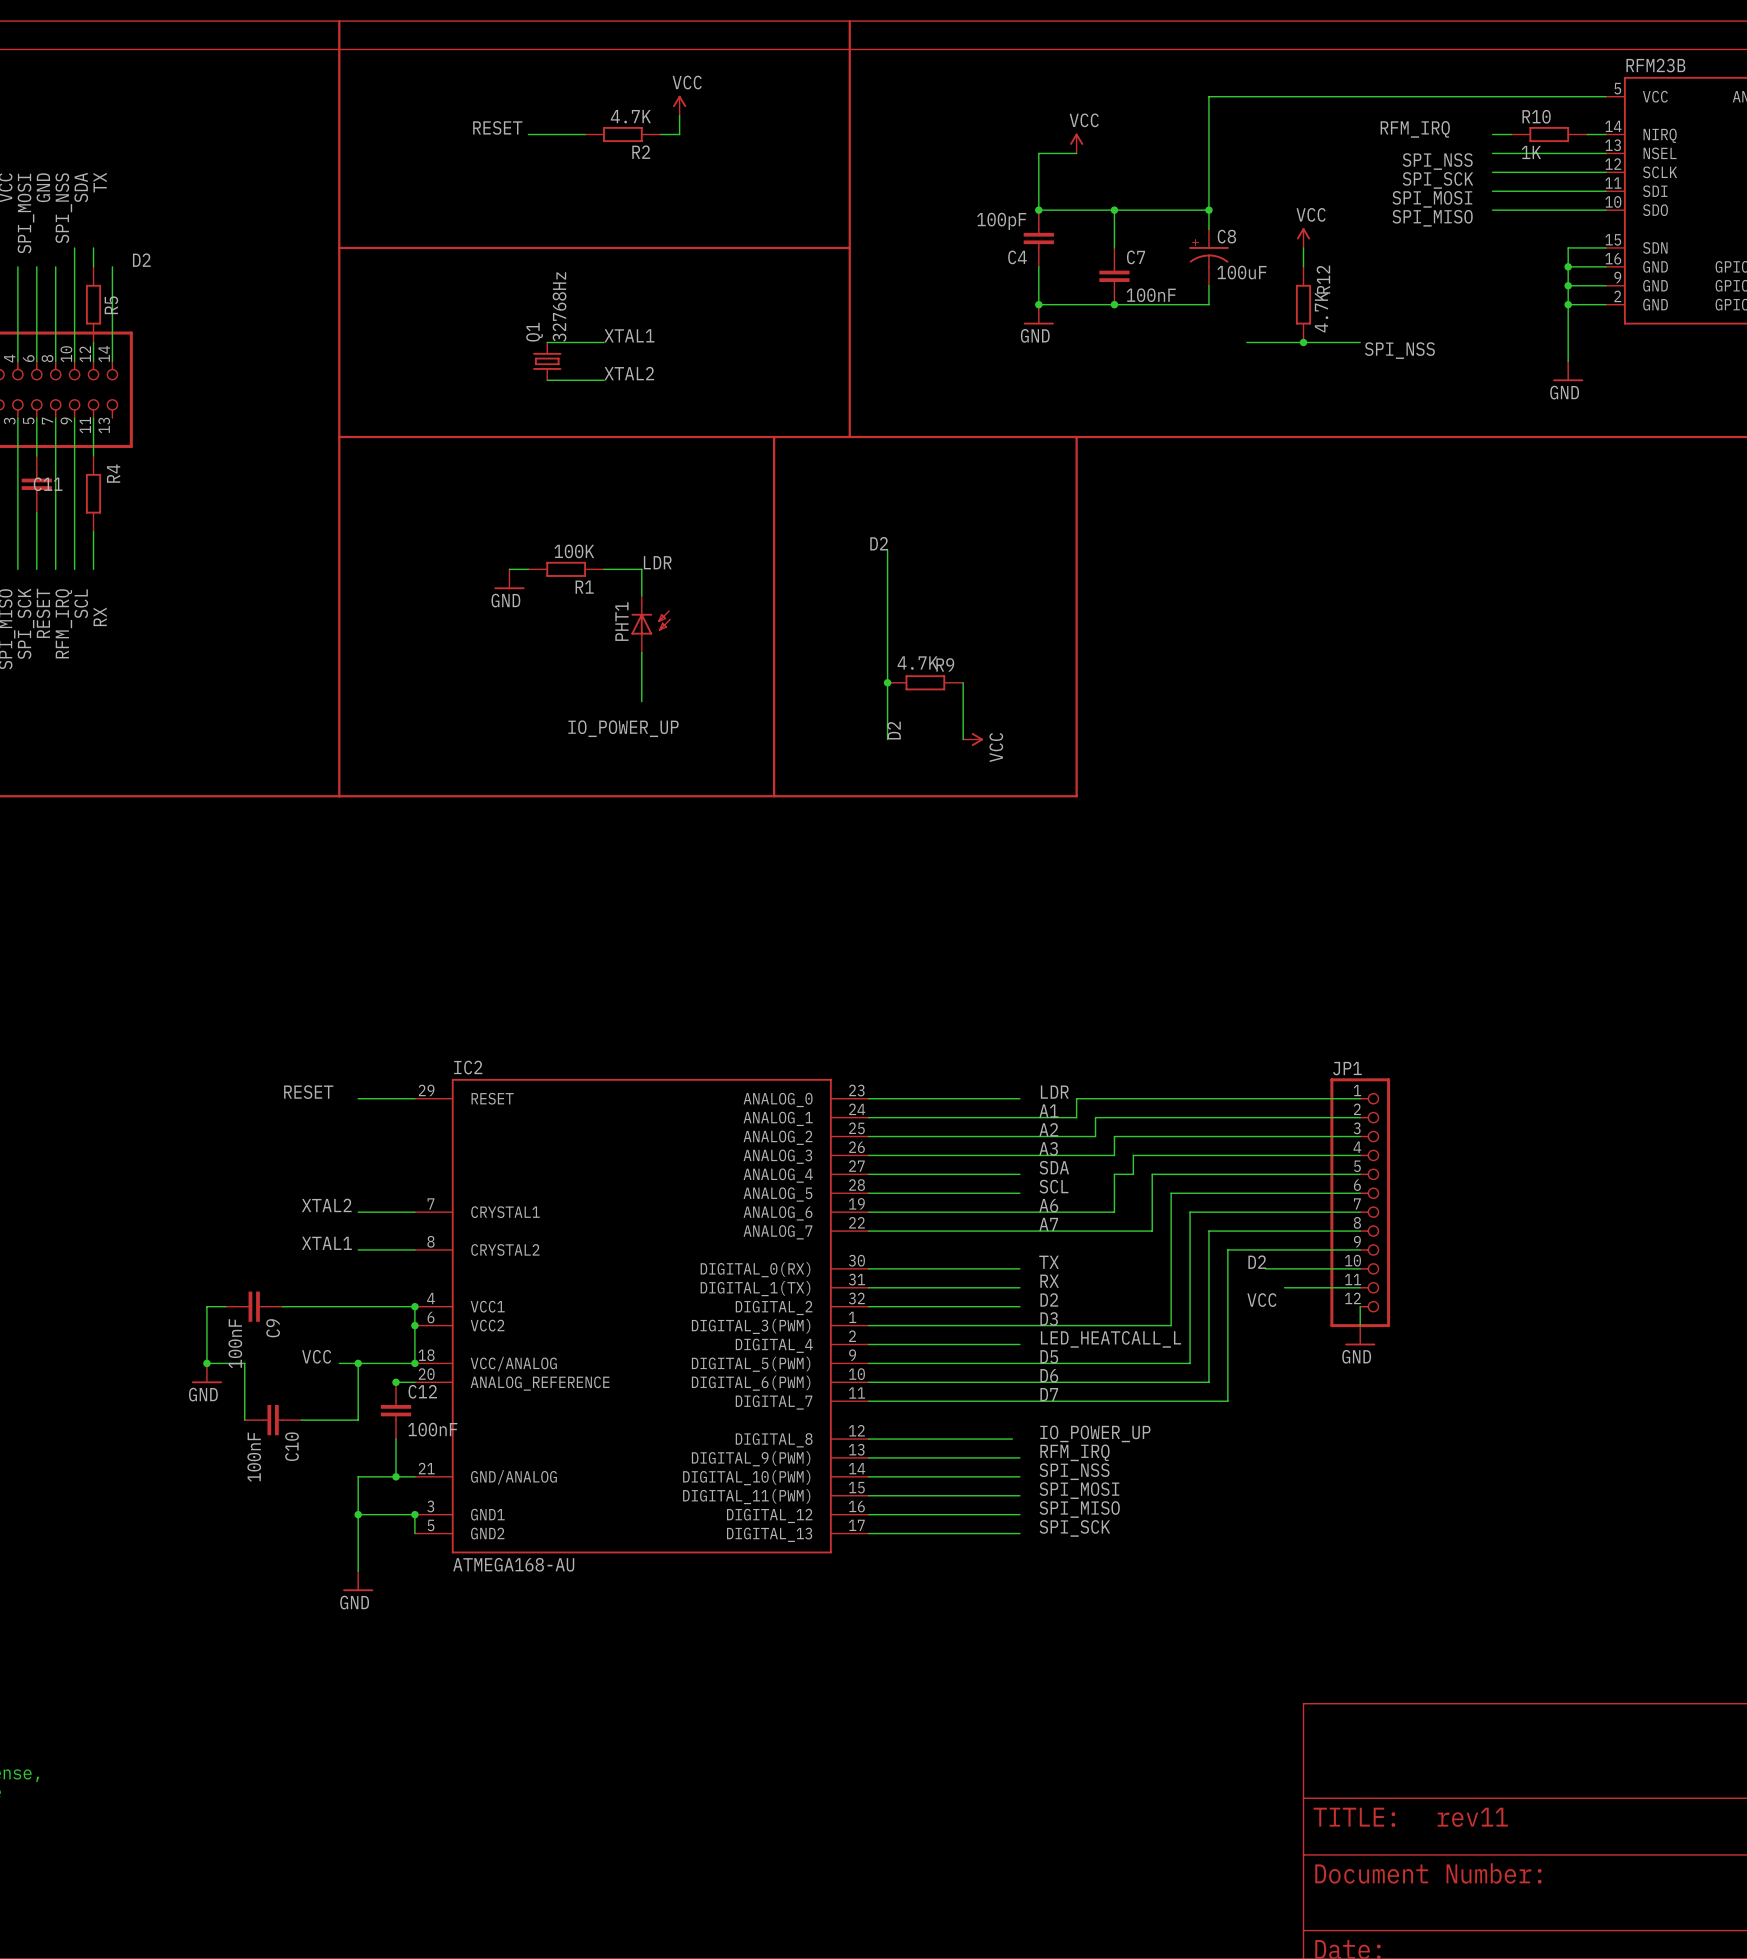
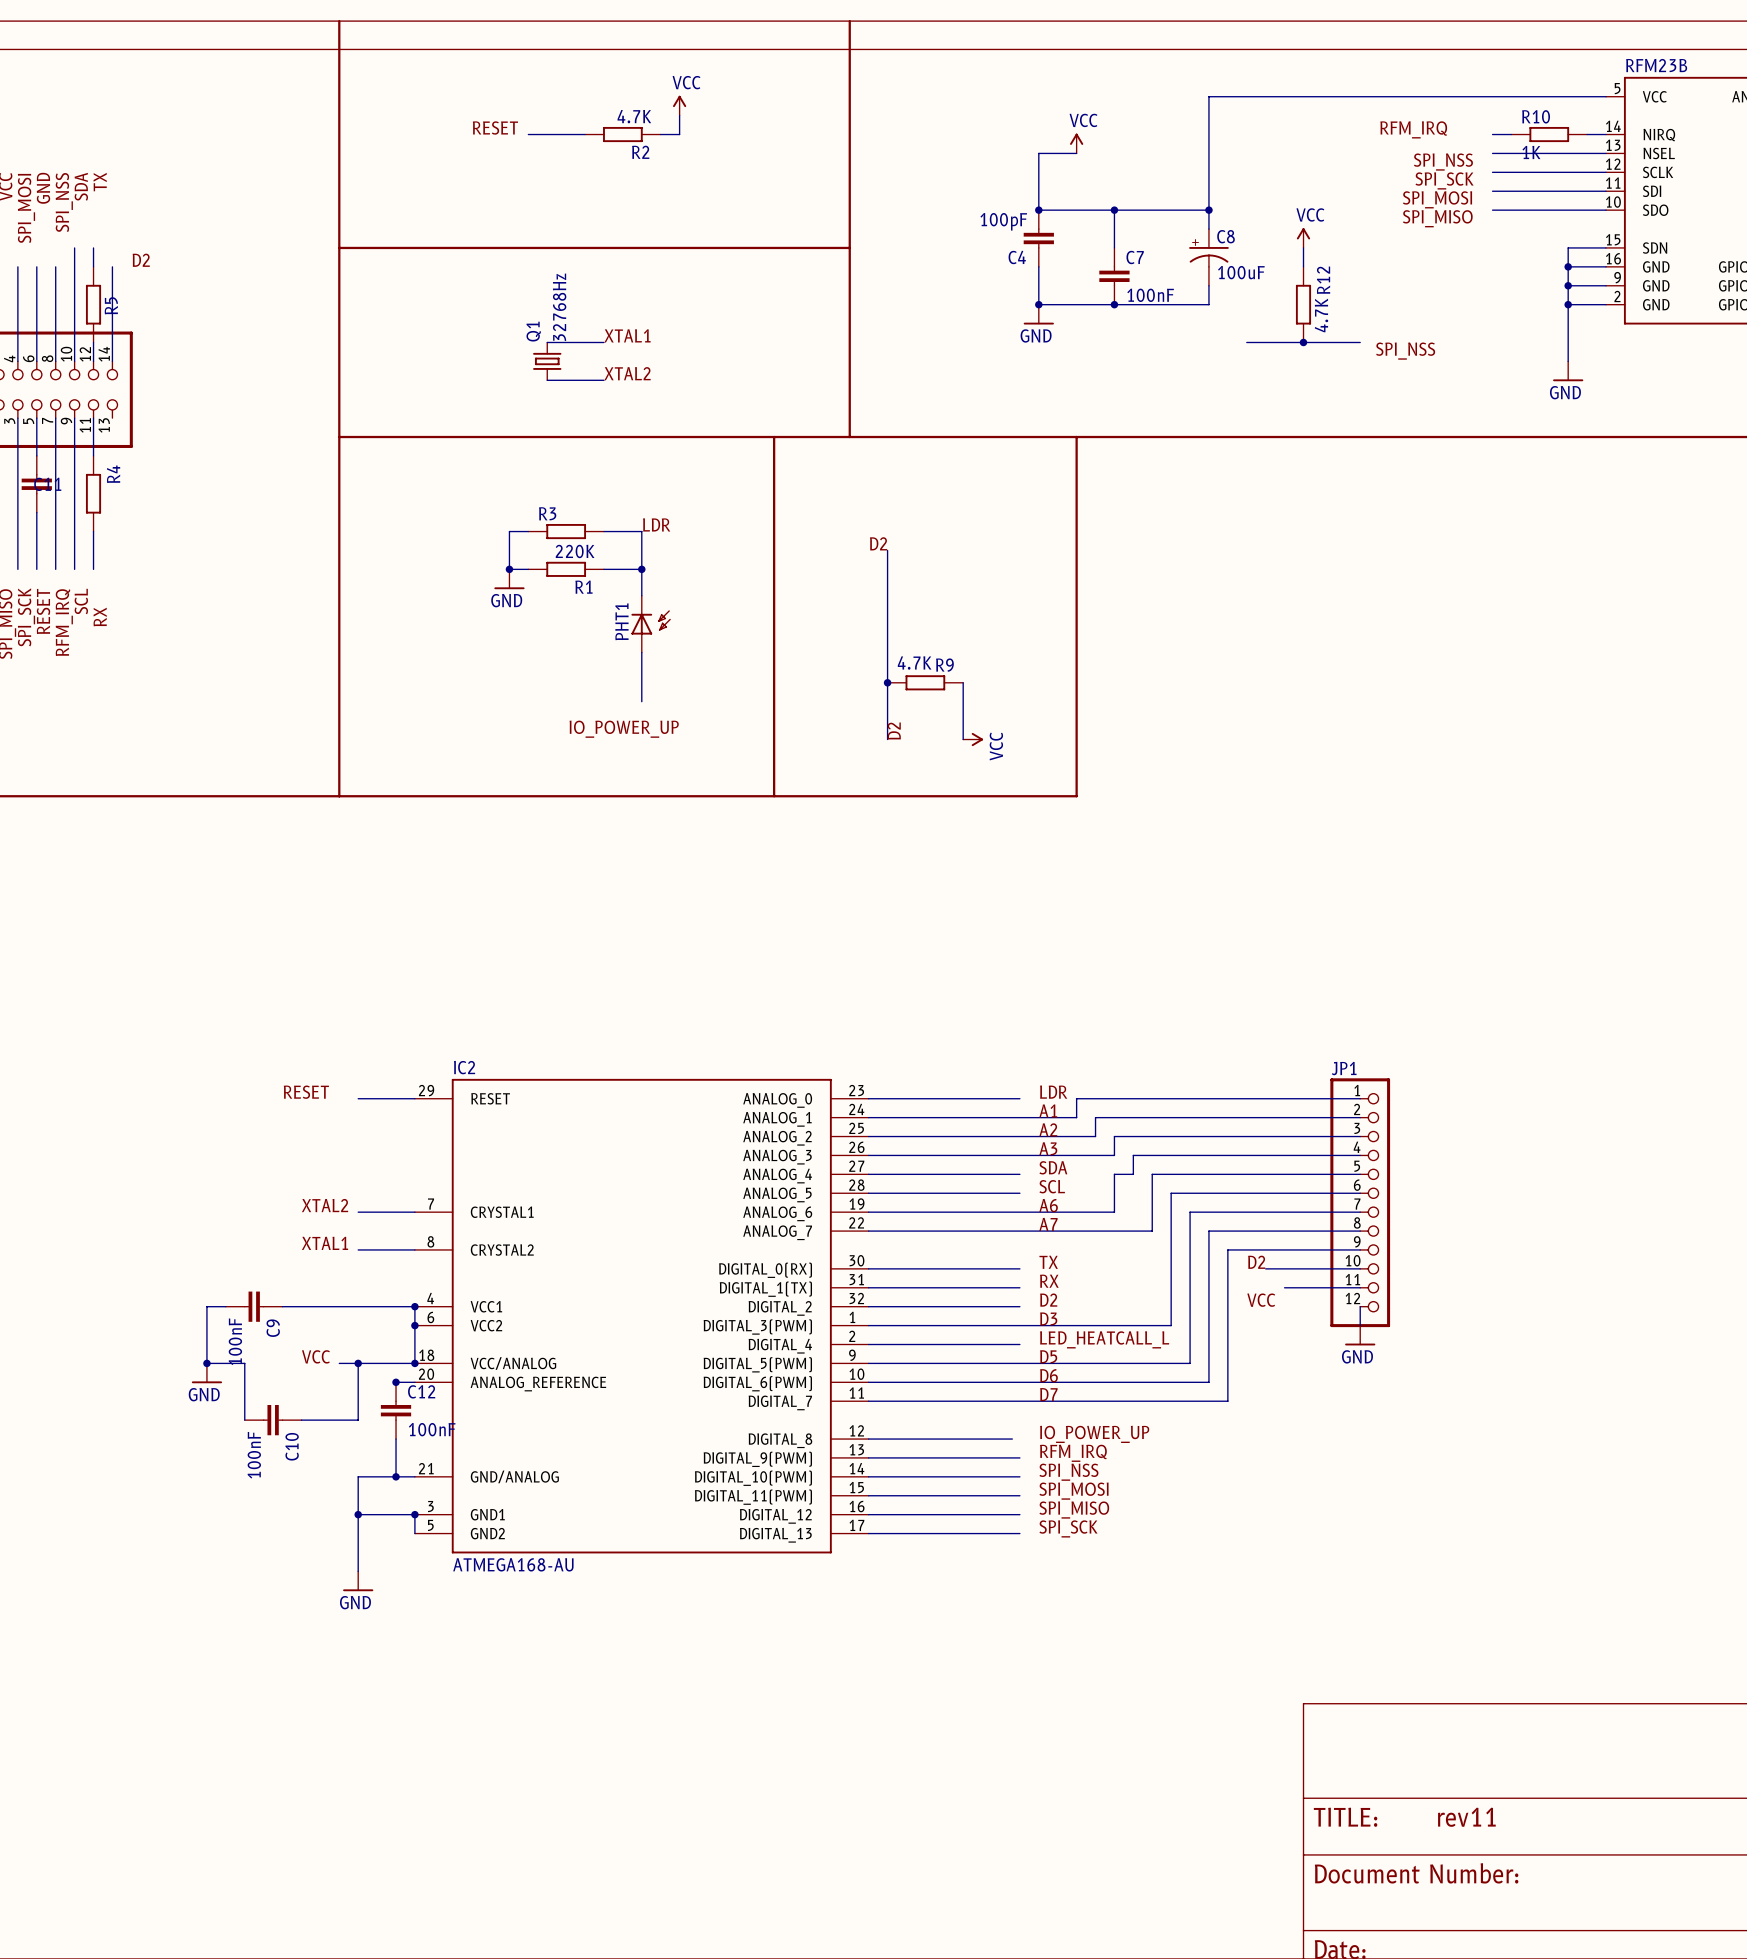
wire: none -> (528, 531) (509, 531) (509, 569)
R3: none -> (566, 531)
wire: none -> (603, 531) (641, 531) (641, 569)
R1 value: 100K (574, 551) -> 220K (575, 551)
label position: LDR (657, 562) -> LDR (656, 524)
junction: none -> (509, 569)
junction: none -> (641, 569)

